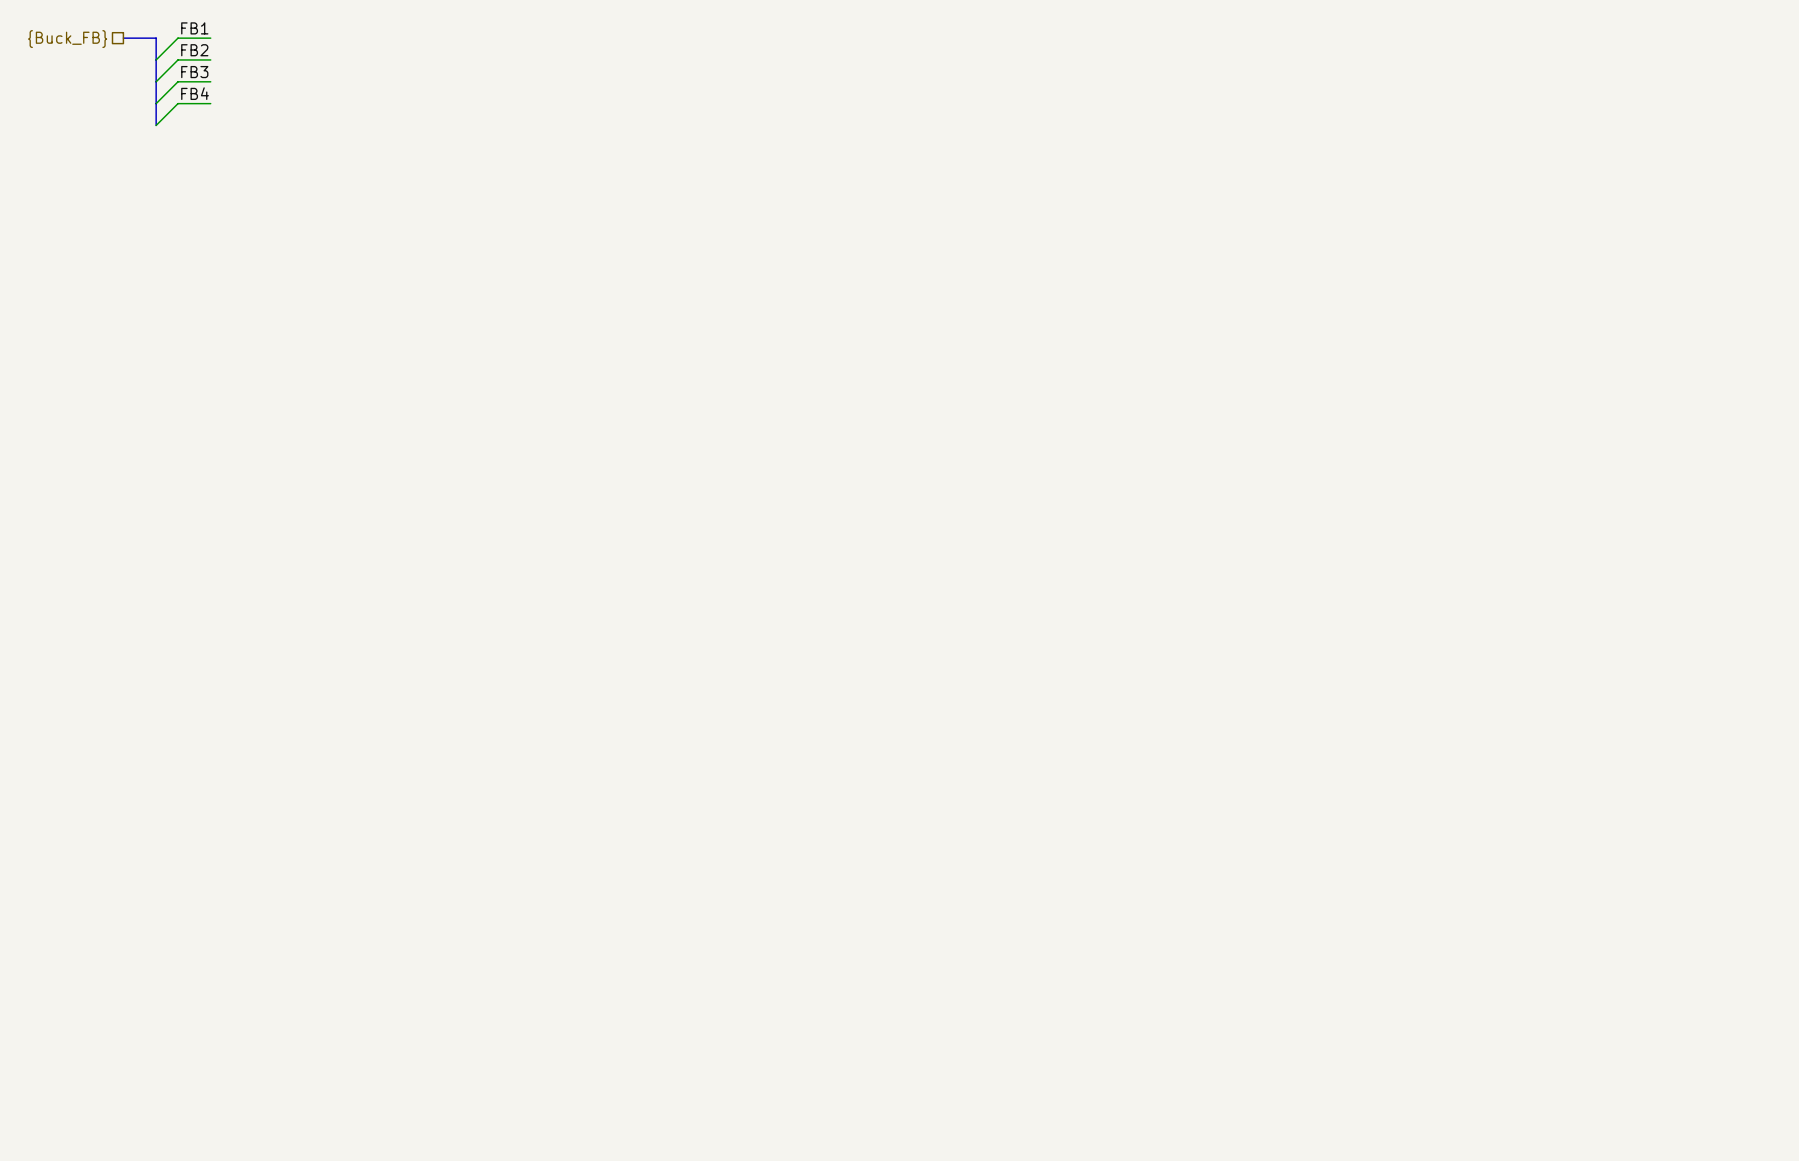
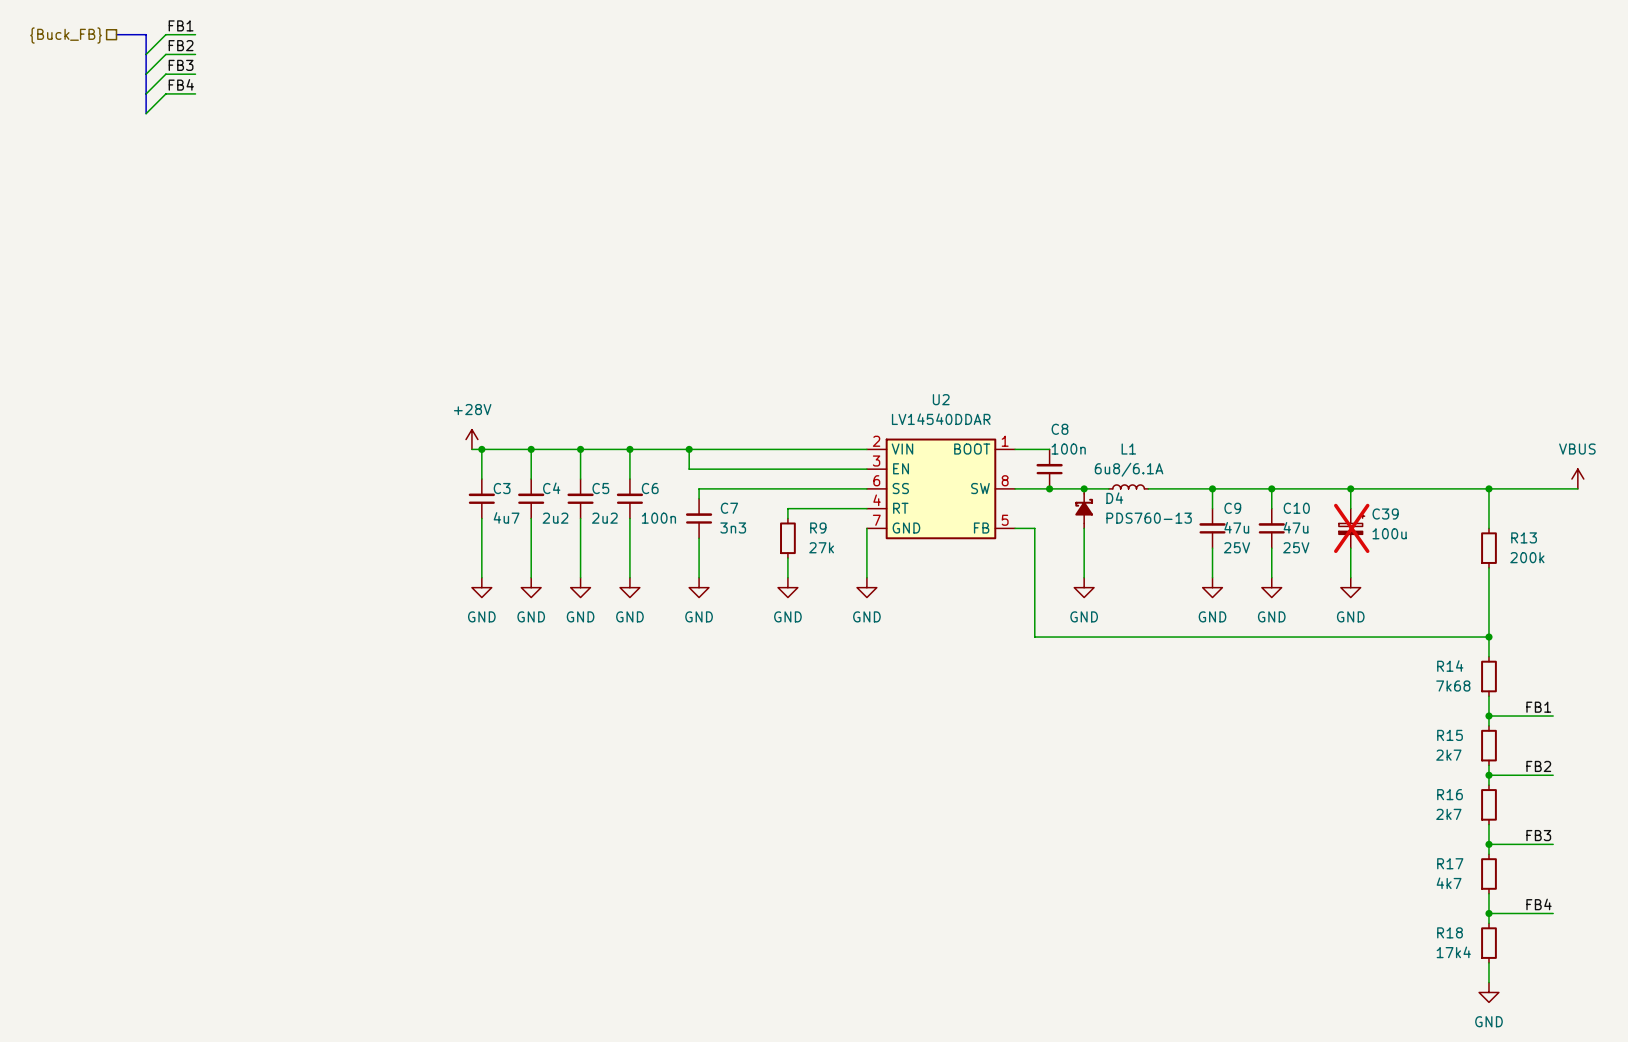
power symbol: none -> +28V (471, 439)
wire: none -> (471, 449) (866, 449)
wire: none -> (481, 449) (481, 479)
junction: none -> (481, 449)
wire: none -> (531, 449) (531, 479)
junction: none -> (531, 449)
wire: none -> (580, 449) (580, 479)
junction: none -> (580, 449)
wire: none -> (629, 449) (629, 479)
junction: none -> (629, 449)
wire: none -> (689, 449) (689, 469) (866, 469)
junction: none -> (689, 449)
wire: none -> (1015, 449) (1049, 449)
C8: none -> (1049, 469)
power symbol: none -> VBUS (1577, 479)
L1: none -> (1128, 486)
wire: none -> (866, 488) (699, 488) (699, 498)
U2: none -> (940, 488)
wire: none -> (1015, 488) (1108, 488)
junction: none -> (1049, 488)
junction: none -> (1084, 488)
wire: none -> (1148, 488) (1577, 488)
wire: none -> (1212, 488) (1212, 508)
junction: none -> (1212, 488)
wire: none -> (1271, 488) (1271, 508)
junction: none -> (1271, 488)
wire: none -> (1350, 488) (1350, 508)
junction: none -> (1350, 488)
wire: none -> (1488, 488) (1488, 528)
junction: none -> (1488, 488)
C3: none -> (481, 498)
C4: none -> (531, 498)
C5: none -> (580, 498)
C6: none -> (629, 498)
wire: none -> (866, 508) (787, 508) (787, 518)
D4: none -> (1084, 508)
wire: none -> (481, 518) (481, 577)
wire: none -> (531, 518) (531, 577)
wire: none -> (580, 518) (580, 577)
wire: none -> (629, 518) (629, 577)
C7: none -> (699, 518)
wire: none -> (866, 528) (866, 577)
wire: none -> (1015, 528) (1034, 528) (1034, 637) (1488, 637)
wire: none -> (1084, 528) (1084, 577)
C9: none -> (1212, 528)
C10: none -> (1271, 528)
C39: none -> (1351, 528)
wire: none -> (699, 538) (699, 577)
R9: none -> (787, 538)
wire: none -> (1212, 548) (1212, 577)
wire: none -> (1271, 548) (1271, 577)
wire: none -> (1350, 548) (1350, 577)
R13: none -> (1488, 548)
wire: none -> (787, 558) (787, 577)
wire: none -> (1488, 567) (1488, 656)
power symbol: none -> GND (481, 587)
power symbol: none -> GND (531, 587)
power symbol: none -> GND (580, 587)
power symbol: none -> GND (629, 587)
power symbol: none -> GND (699, 587)
power symbol: none -> GND (787, 587)
power symbol: none -> GND (866, 587)
power symbol: none -> GND (1084, 587)
power symbol: none -> GND (1212, 587)
power symbol: none -> GND (1271, 587)
power symbol: none -> GND (1350, 587)
junction: none -> (1488, 637)
R14: none -> (1488, 676)
wire: none -> (1488, 696) (1488, 725)
label: none -> FB1 (1538, 707)
wire: none -> (1488, 716) (1553, 716)
junction: none -> (1488, 716)
R15: none -> (1488, 745)
wire: none -> (1488, 765) (1488, 785)
label: none -> FB2 (1538, 766)
wire: none -> (1488, 775) (1553, 775)
junction: none -> (1488, 775)
R16: none -> (1488, 804)
wire: none -> (1488, 824) (1488, 854)
label: none -> FB3 (1538, 835)
wire: none -> (1488, 844) (1553, 844)
junction: none -> (1488, 844)
R17: none -> (1488, 873)
wire: none -> (1488, 893) (1488, 923)
label: none -> FB4 (1538, 904)
wire: none -> (1488, 913) (1553, 913)
junction: none -> (1488, 913)
R18: none -> (1488, 943)
wire: none -> (1488, 962) (1488, 982)
power symbol: none -> GND (1488, 992)

